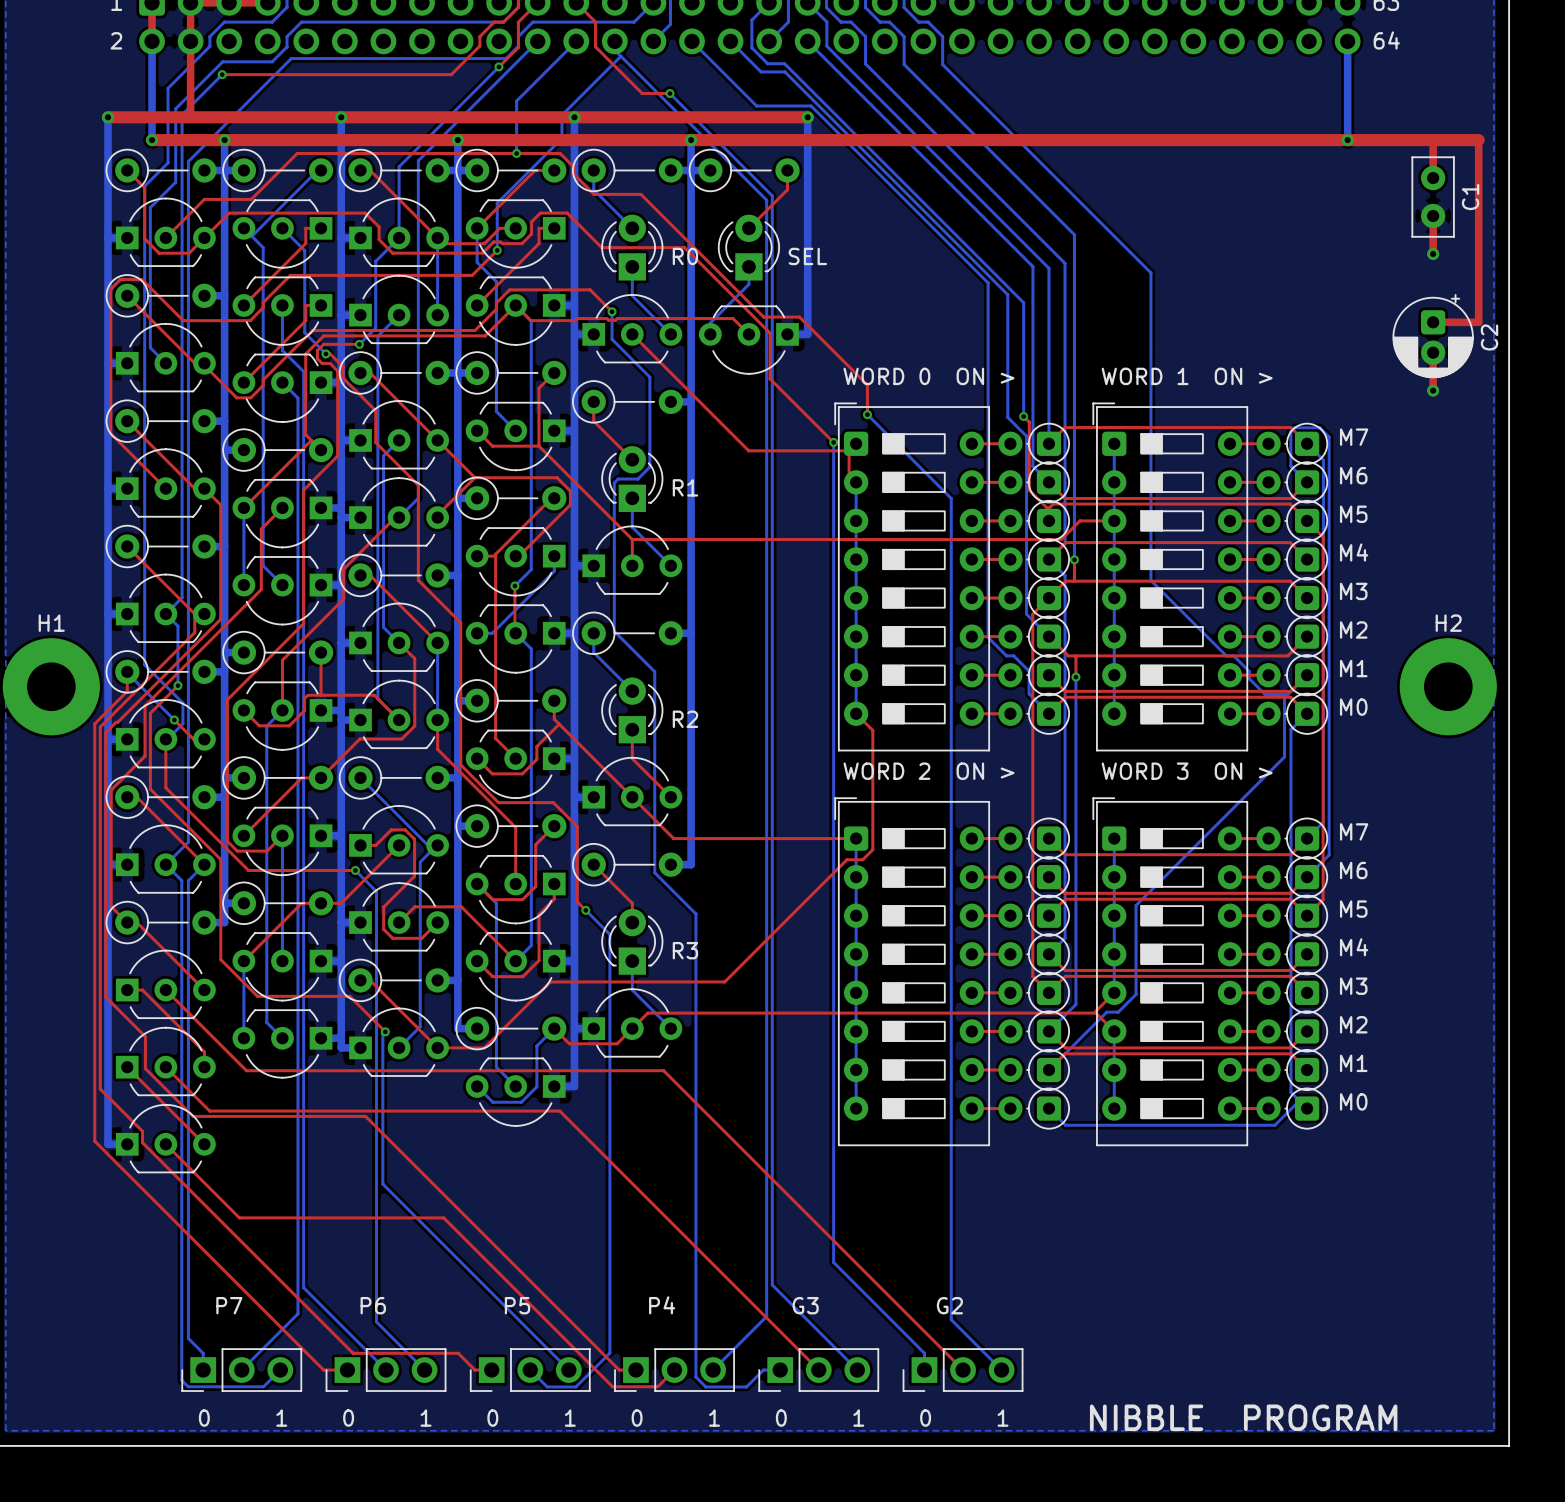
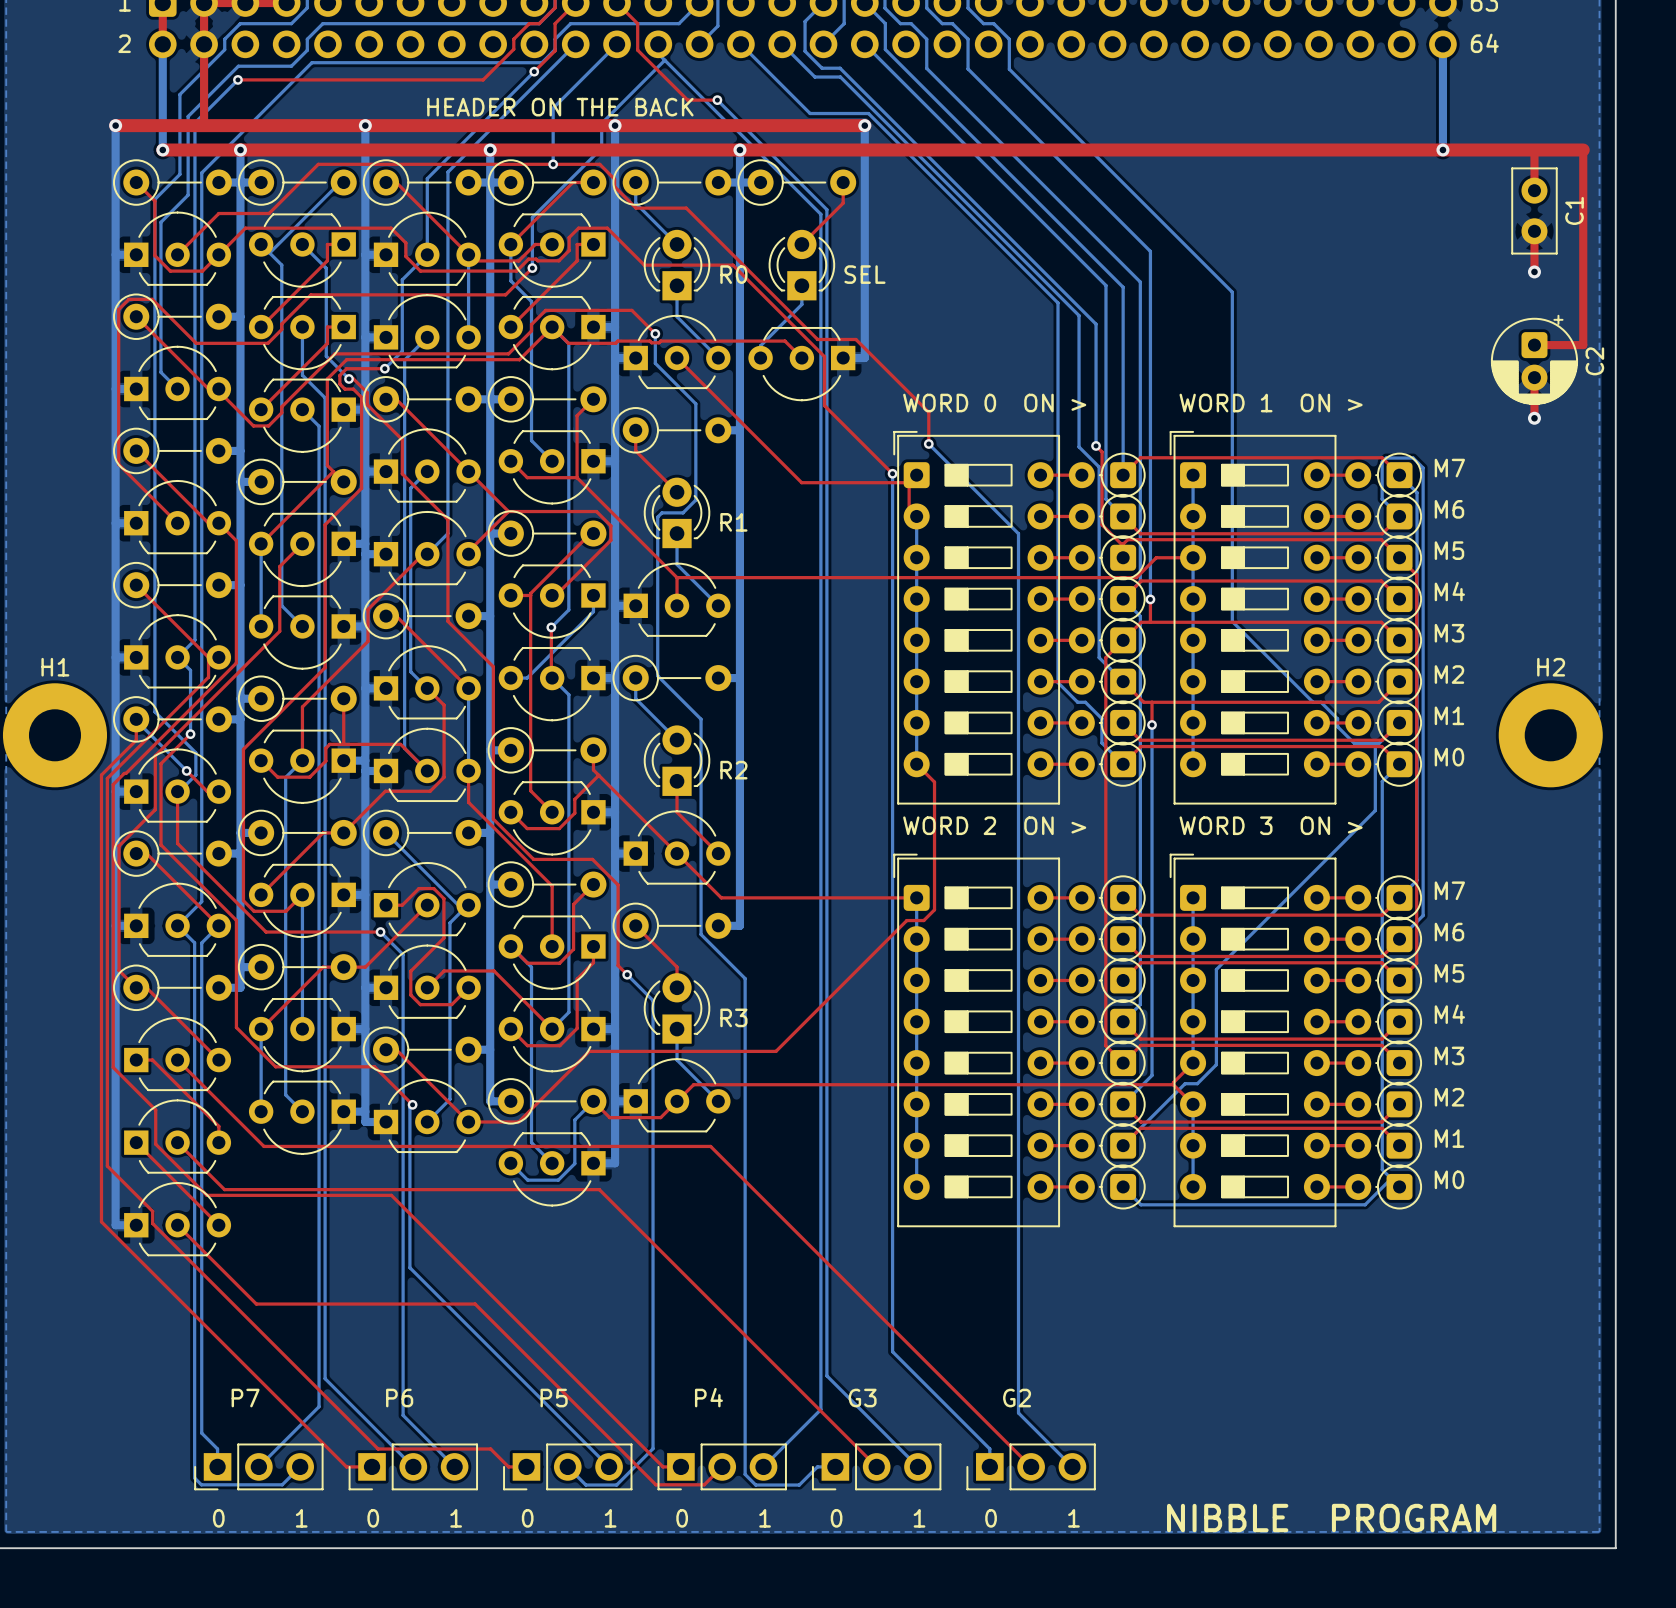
text: none -> HEADER ON THE BACK (560, 107)

